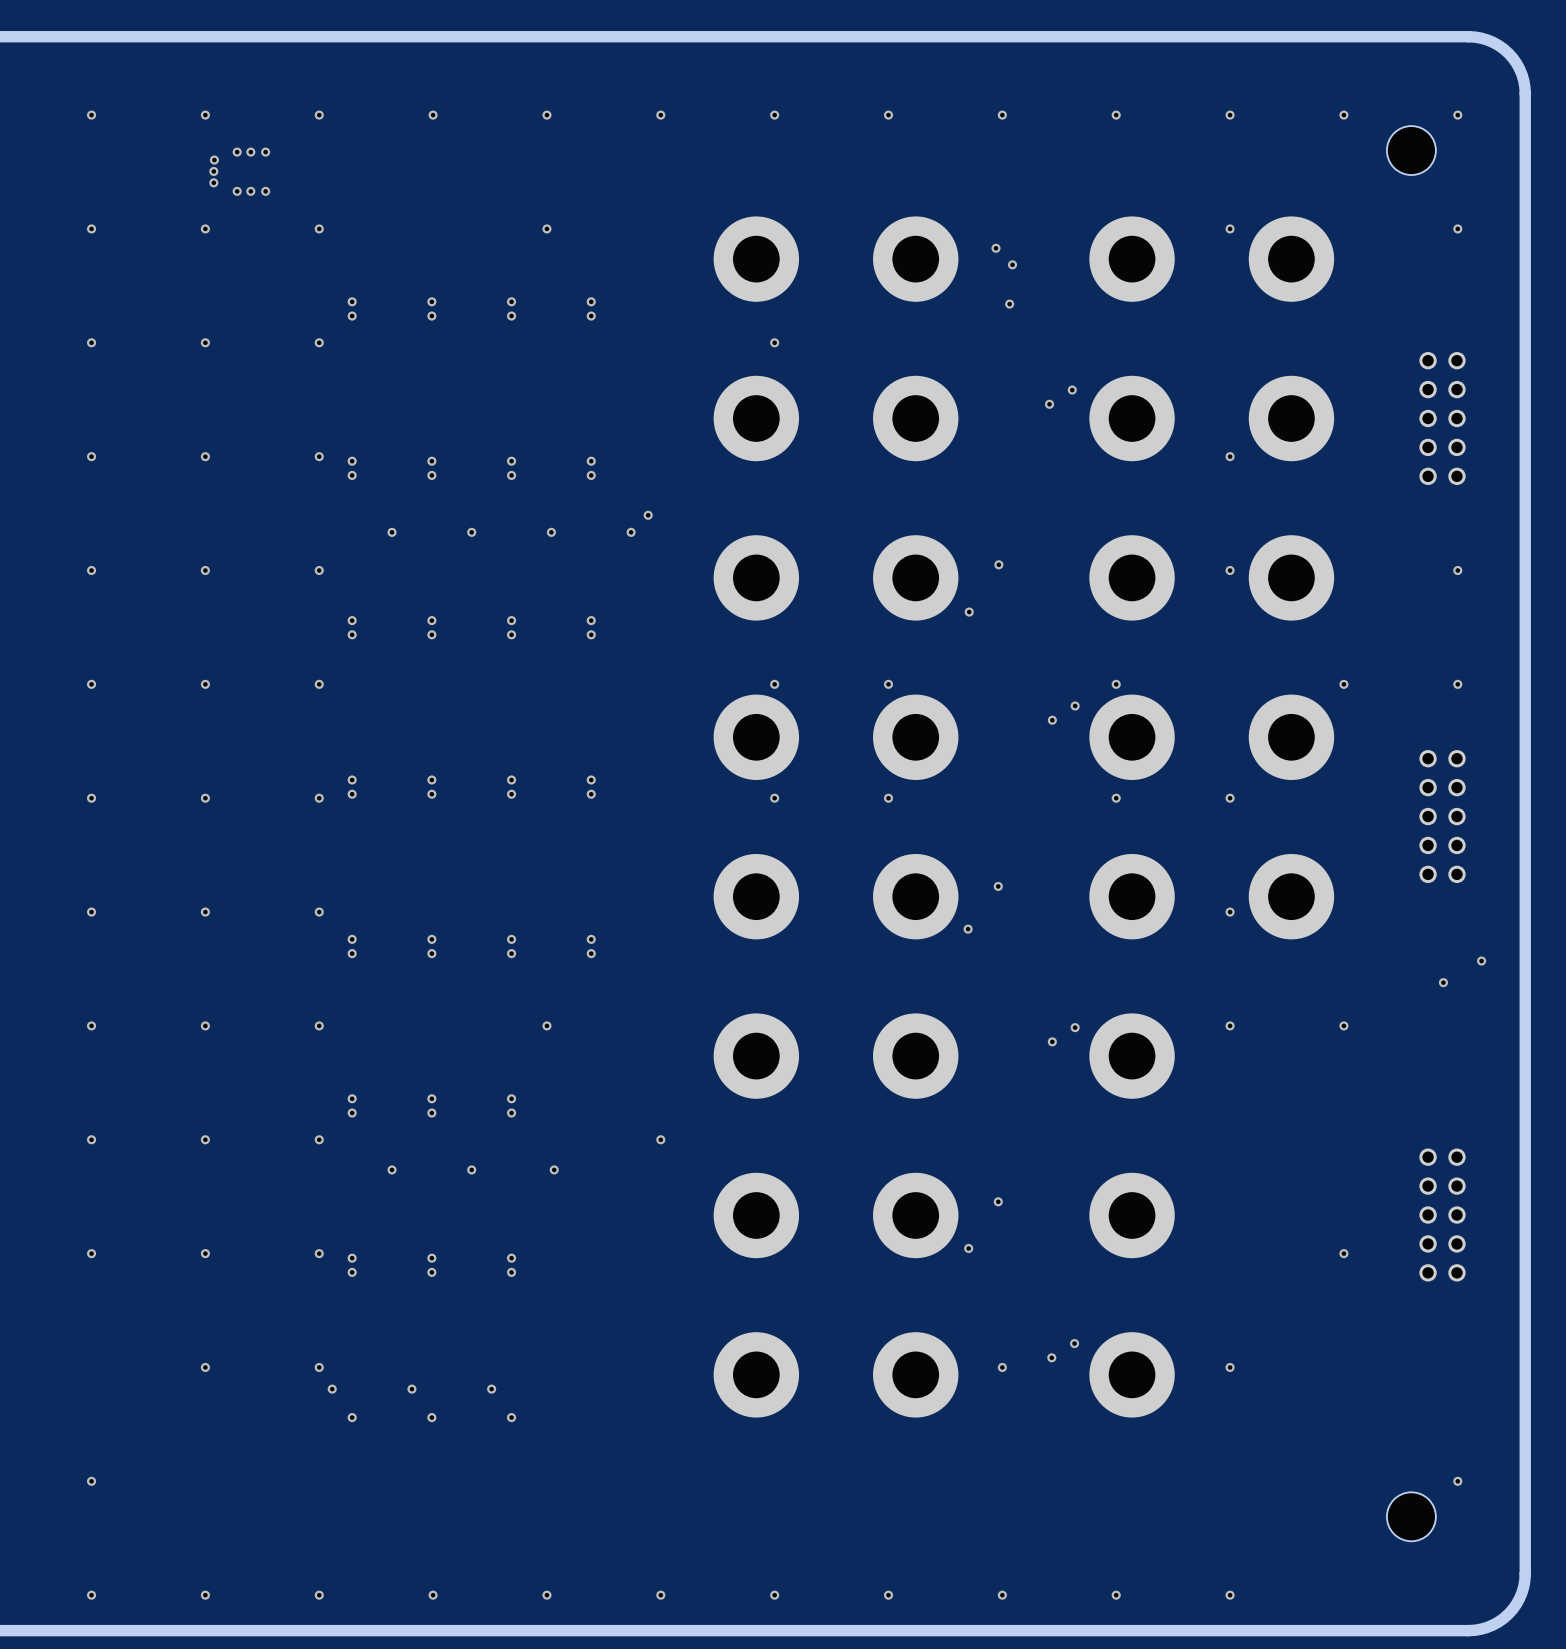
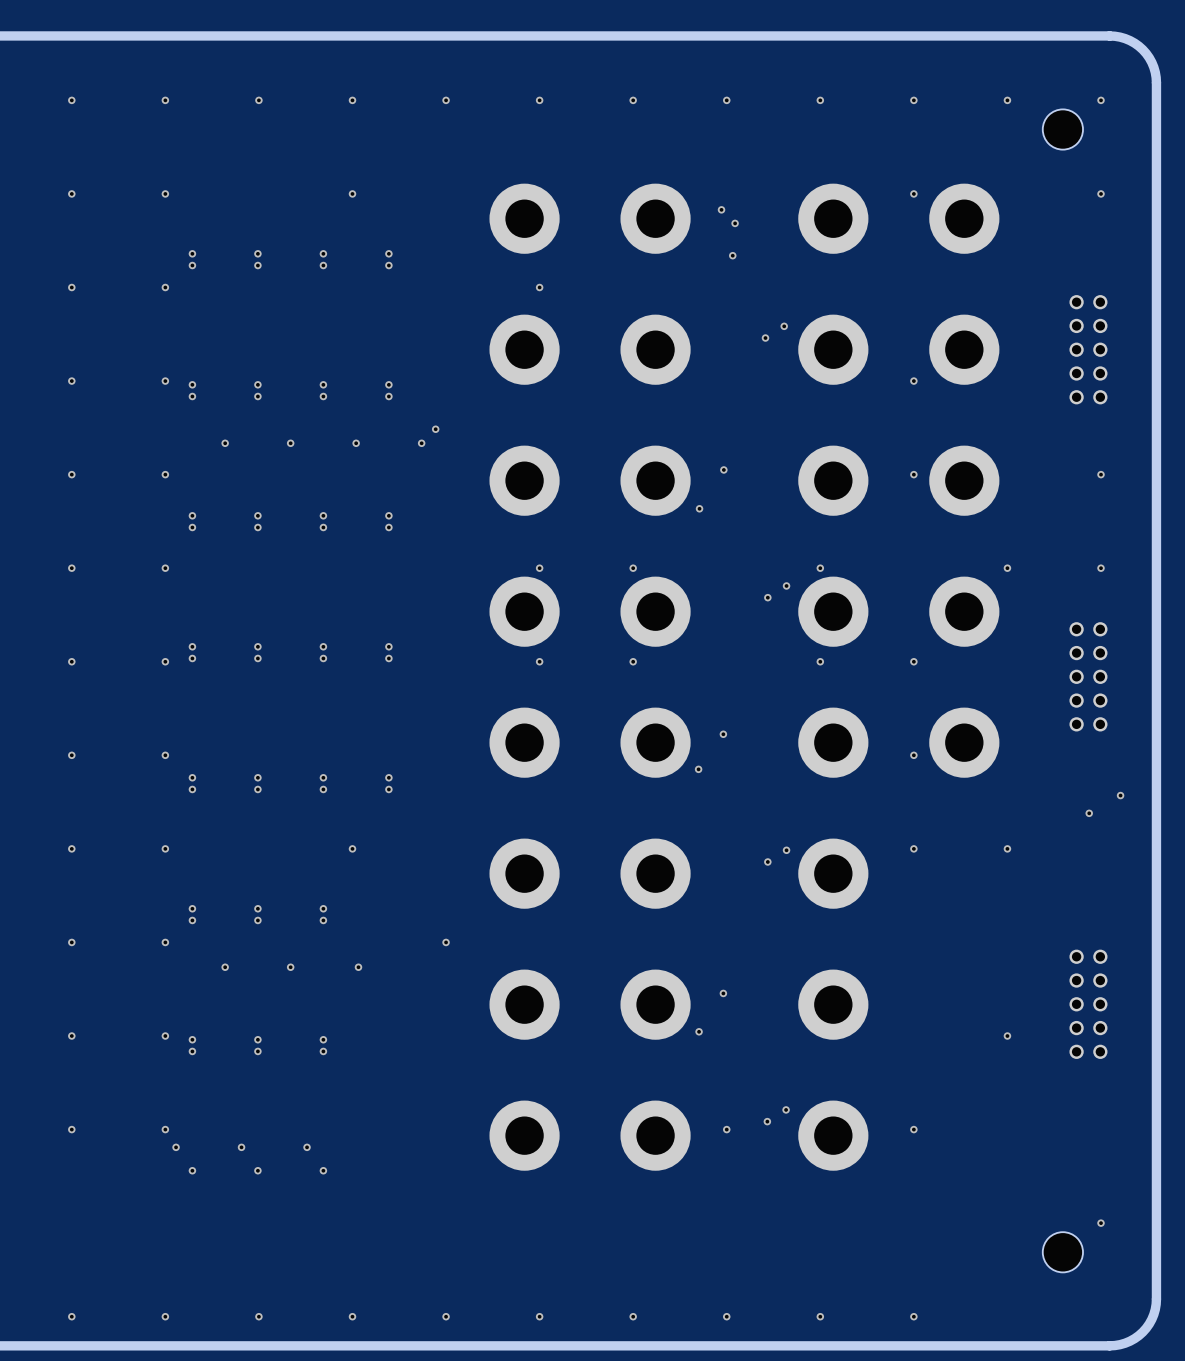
via: (237, 152) -> none
via: (250, 152) -> none
via: (265, 152) -> none
via: (214, 160) -> none
via: (213, 171) -> none
via: (213, 182) -> none
via: (237, 191) -> none
via: (250, 191) -> none
via: (265, 191) -> none

